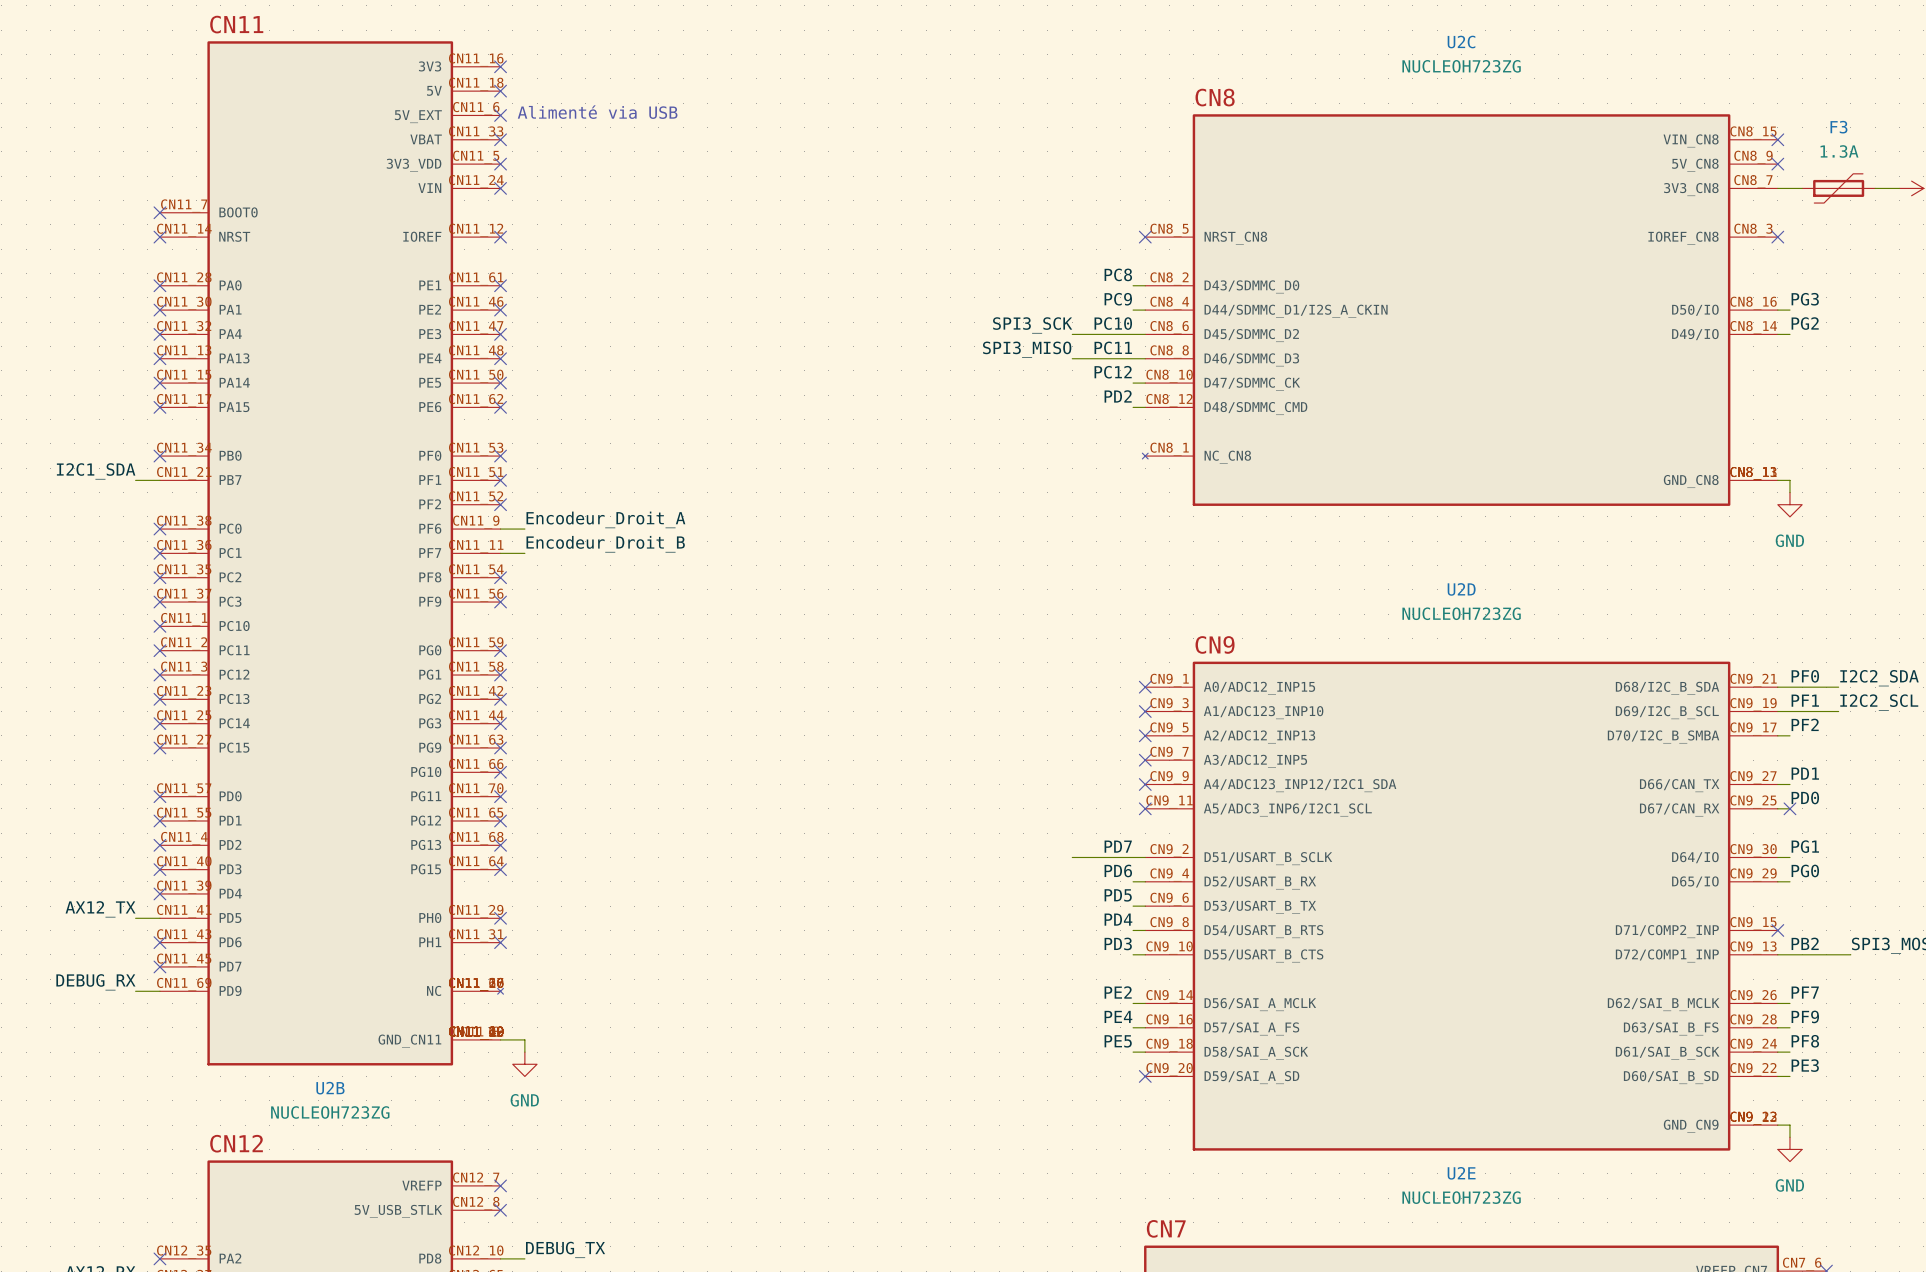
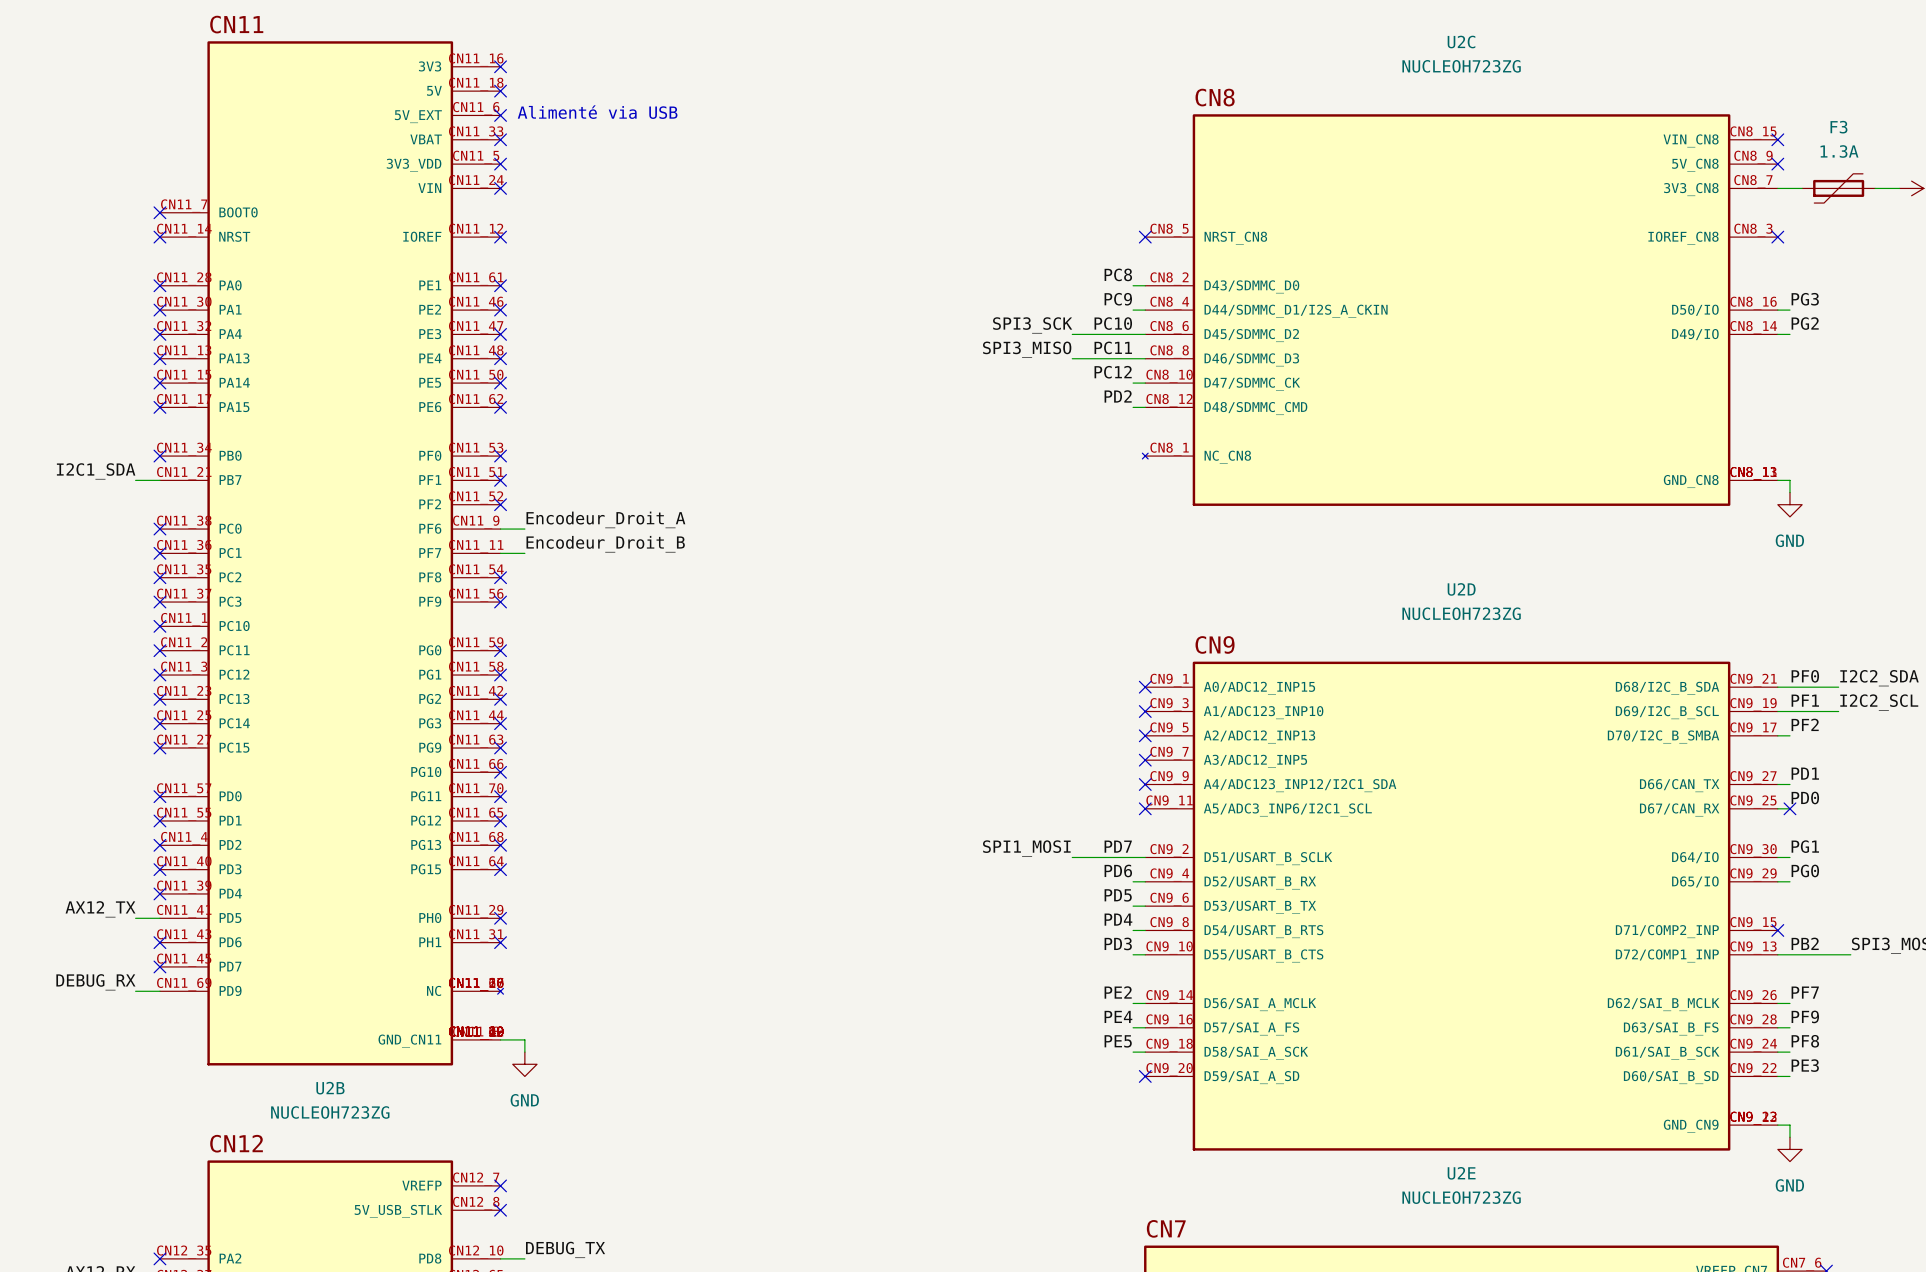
label: none -> SPI1_MOSI (1026, 848)

